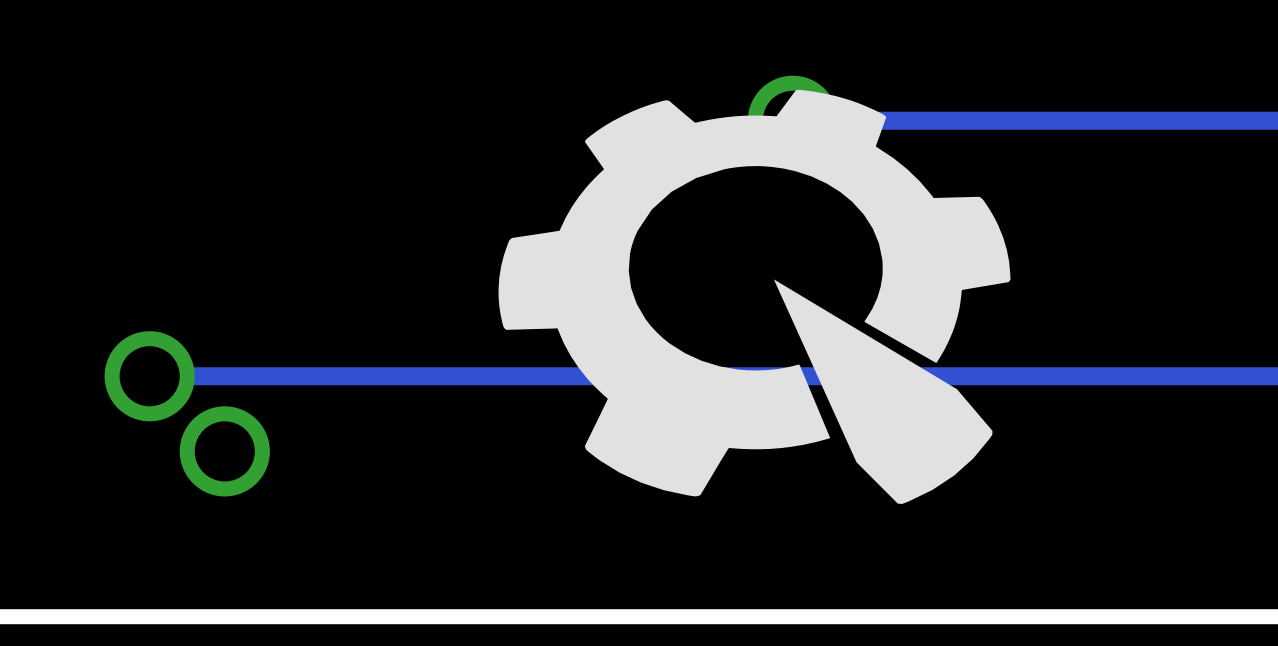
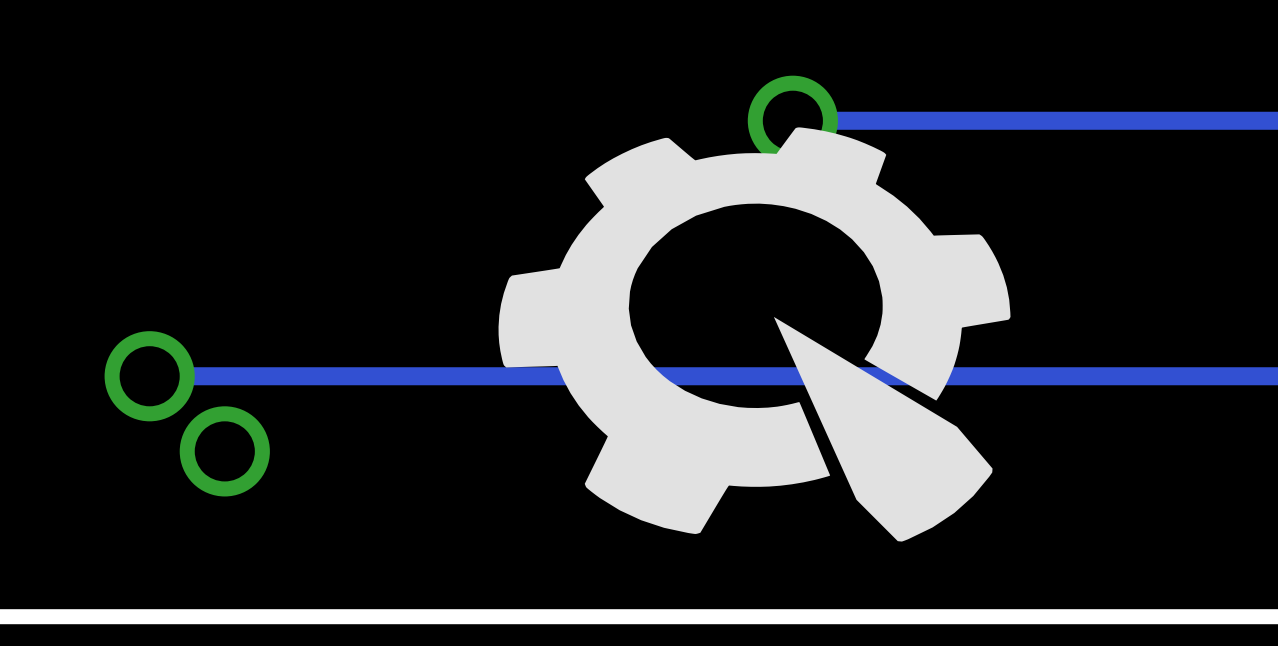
drawing position: (754, 296) -> (754, 334)

